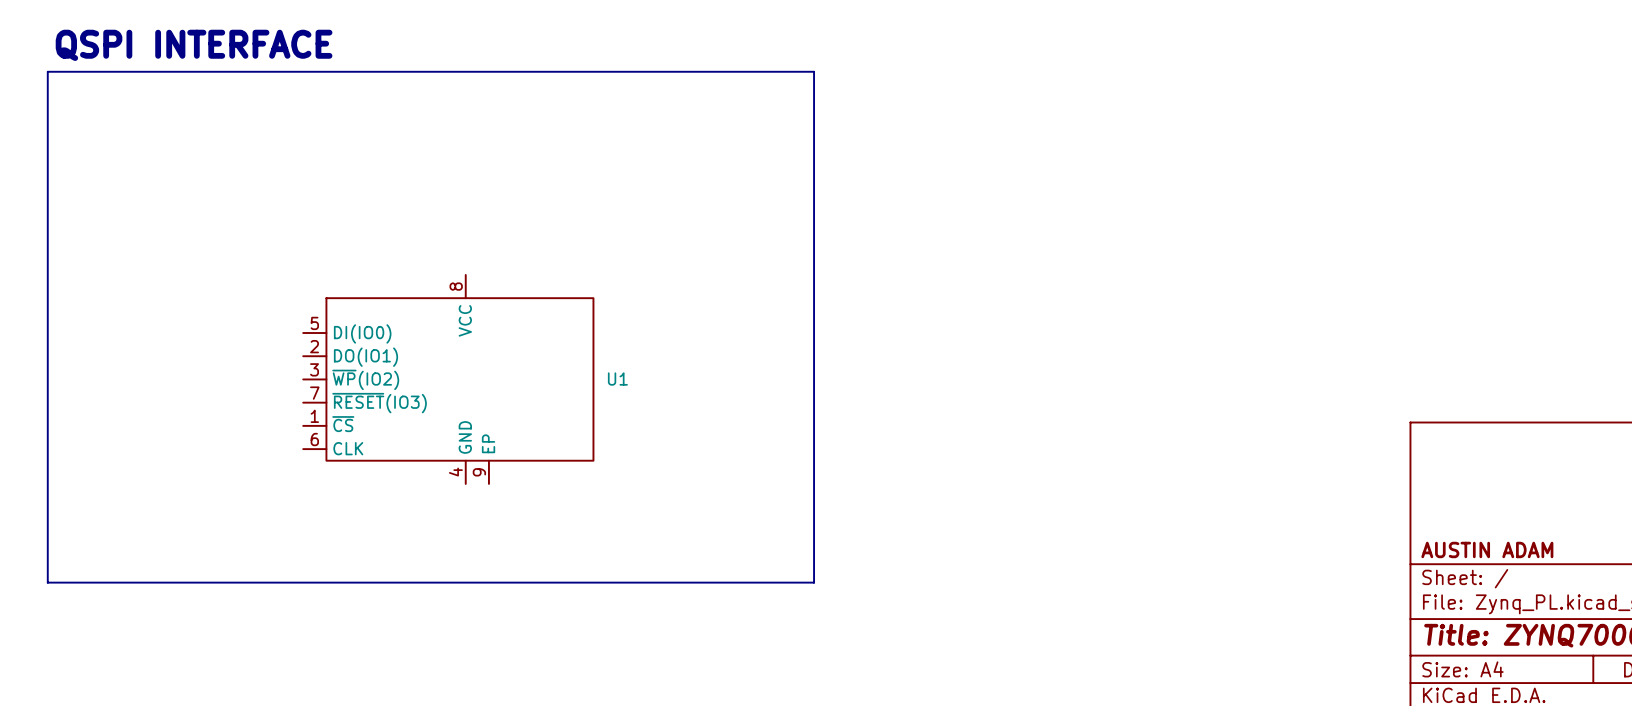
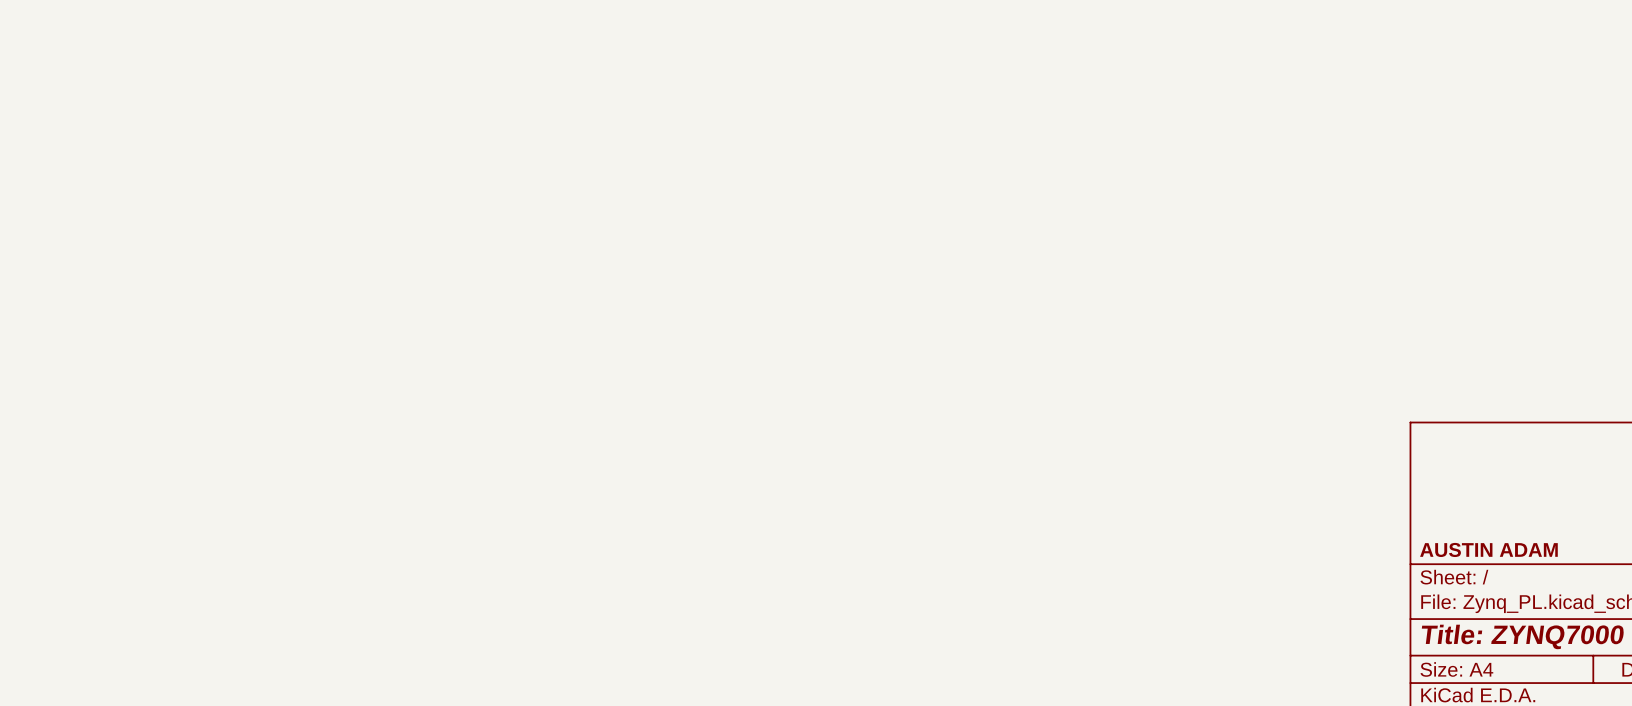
text: QSPI INTERFACE (194, 45) -> none
line: (47, 71) (814, 71) (814, 582) (47, 582) (47, 71) -> none
U1: (448, 379) -> none

